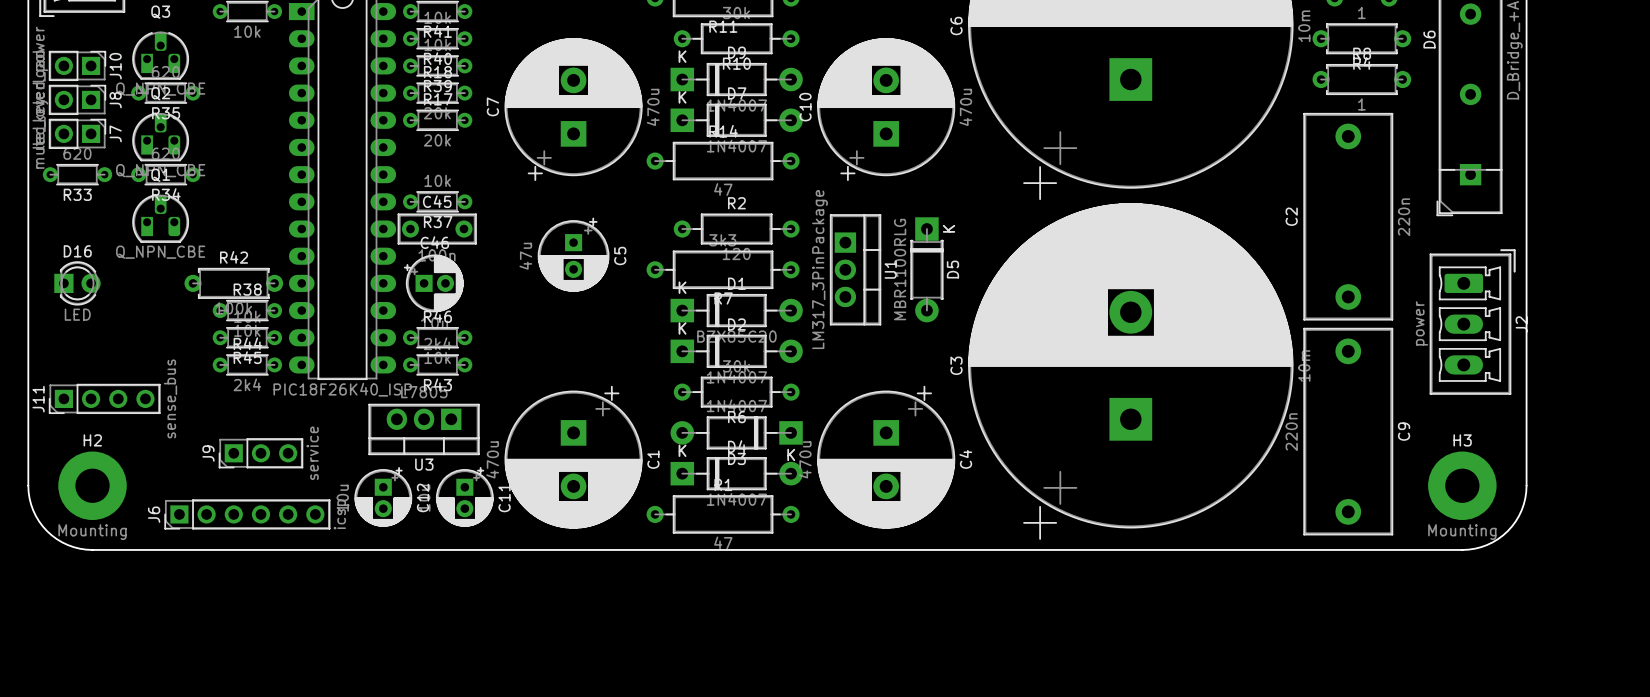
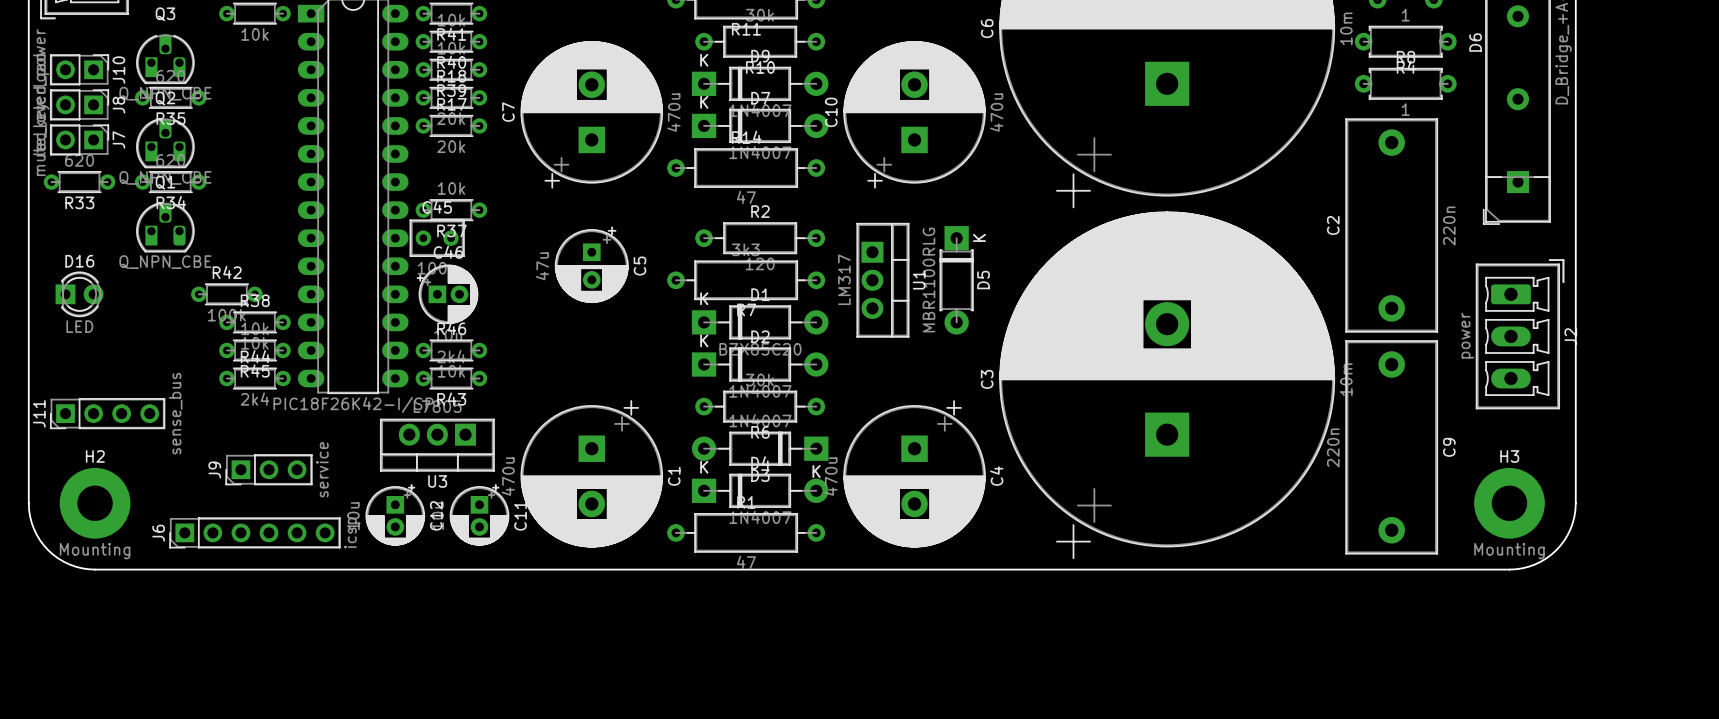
C45 footprint: [397, 213, 477, 245] -> [409, 219, 465, 257]
R42 footprint: [184, 268, 284, 299] -> [191, 283, 263, 306]
U1 value: LM317_3PinPackage (820, 269) -> LM317 (844, 279)
part value: PIC18F26K40_ISP (342, 389) -> PIC18F26K42-I/SP (353, 404)

